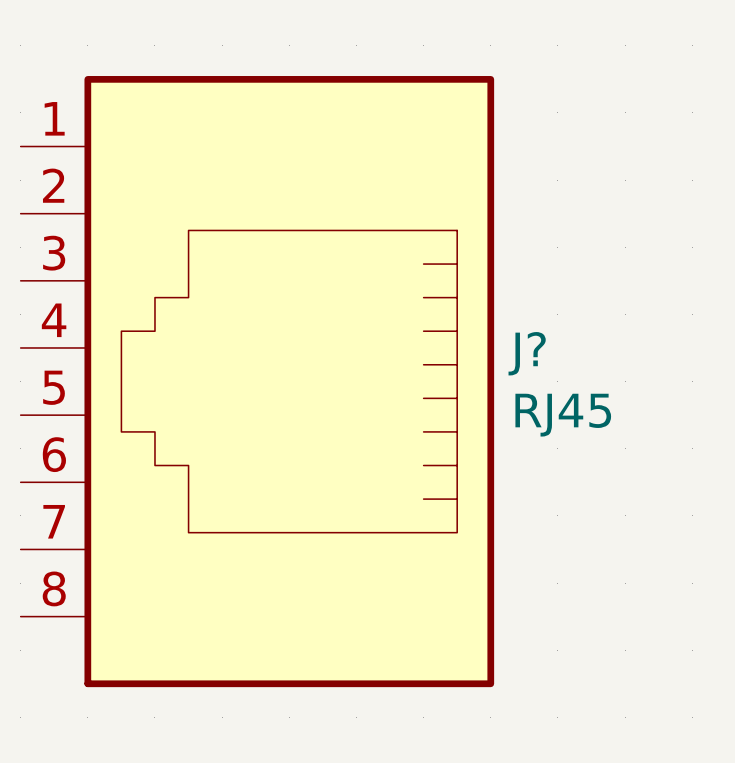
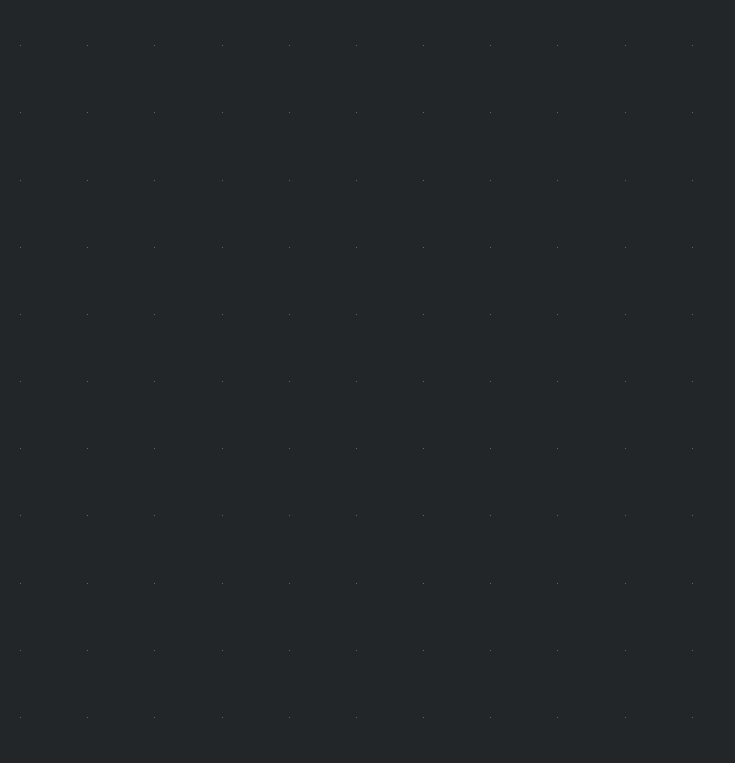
J?: RJ45 (257, 381) -> none

